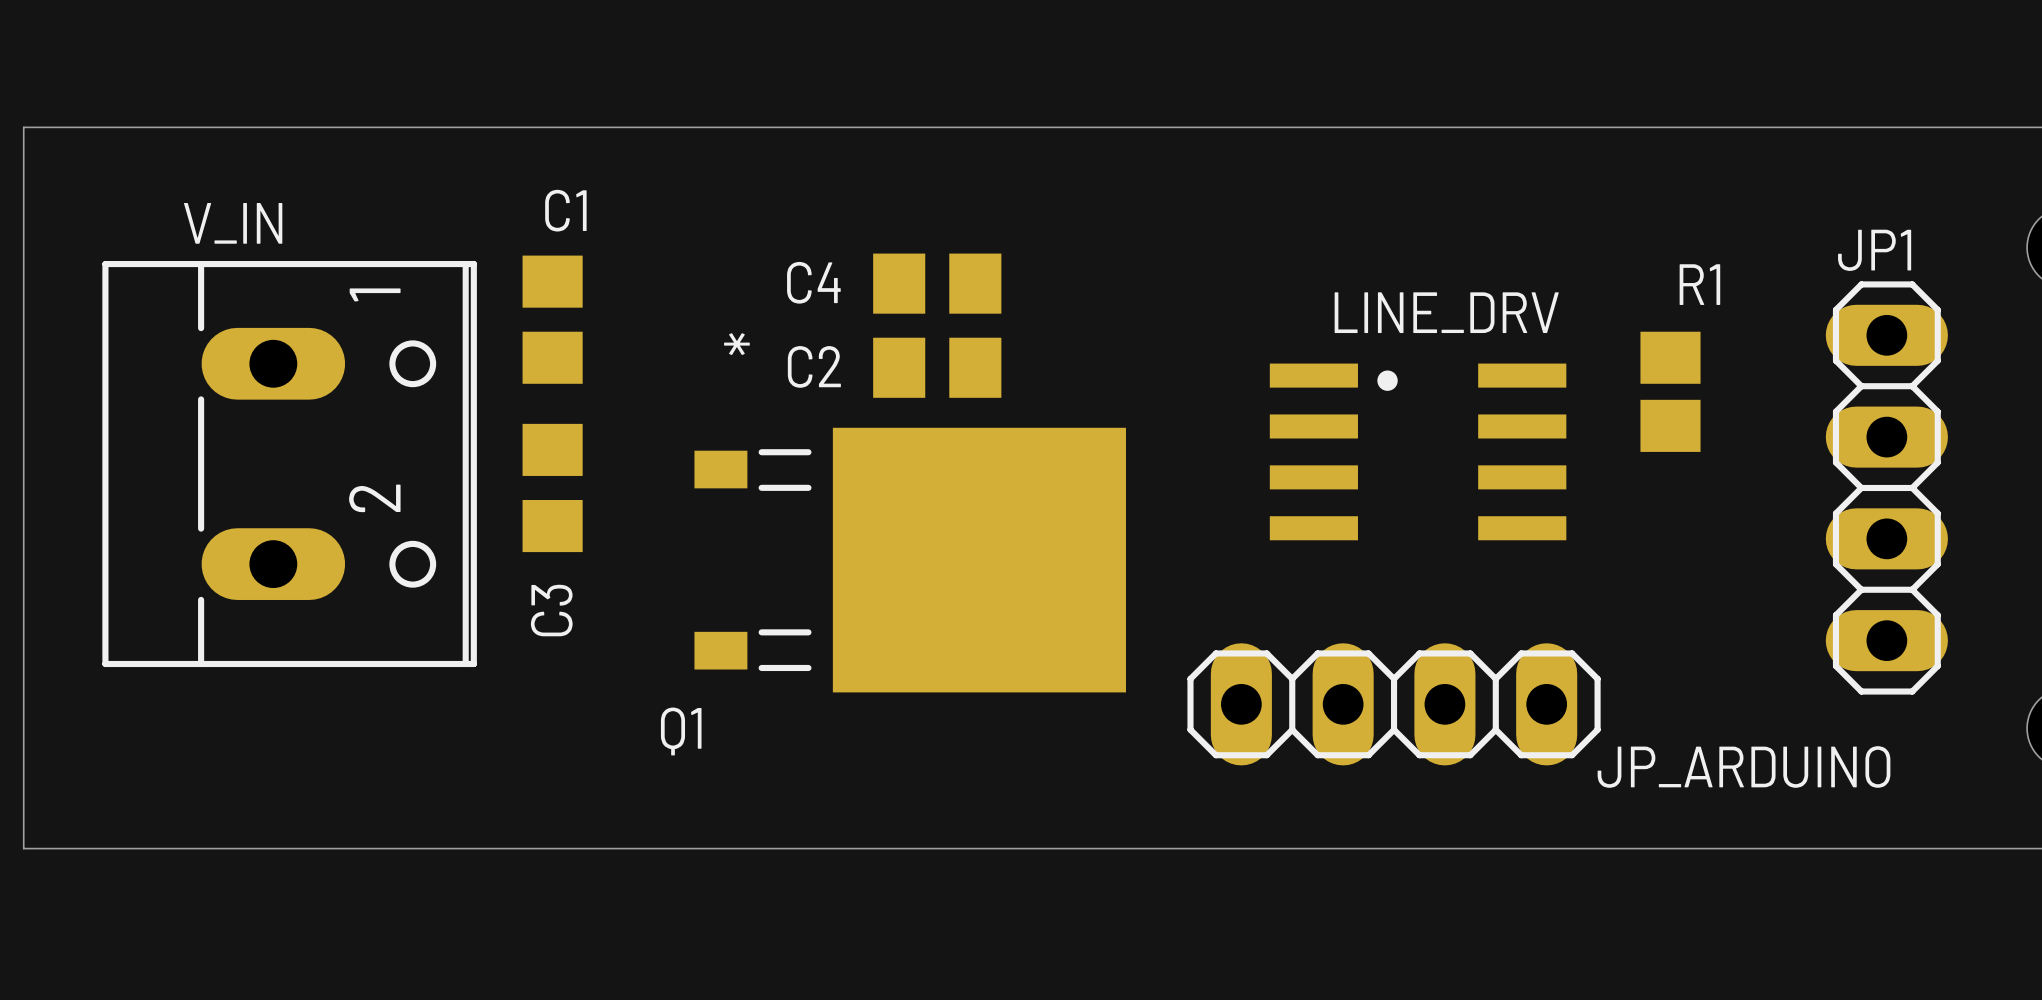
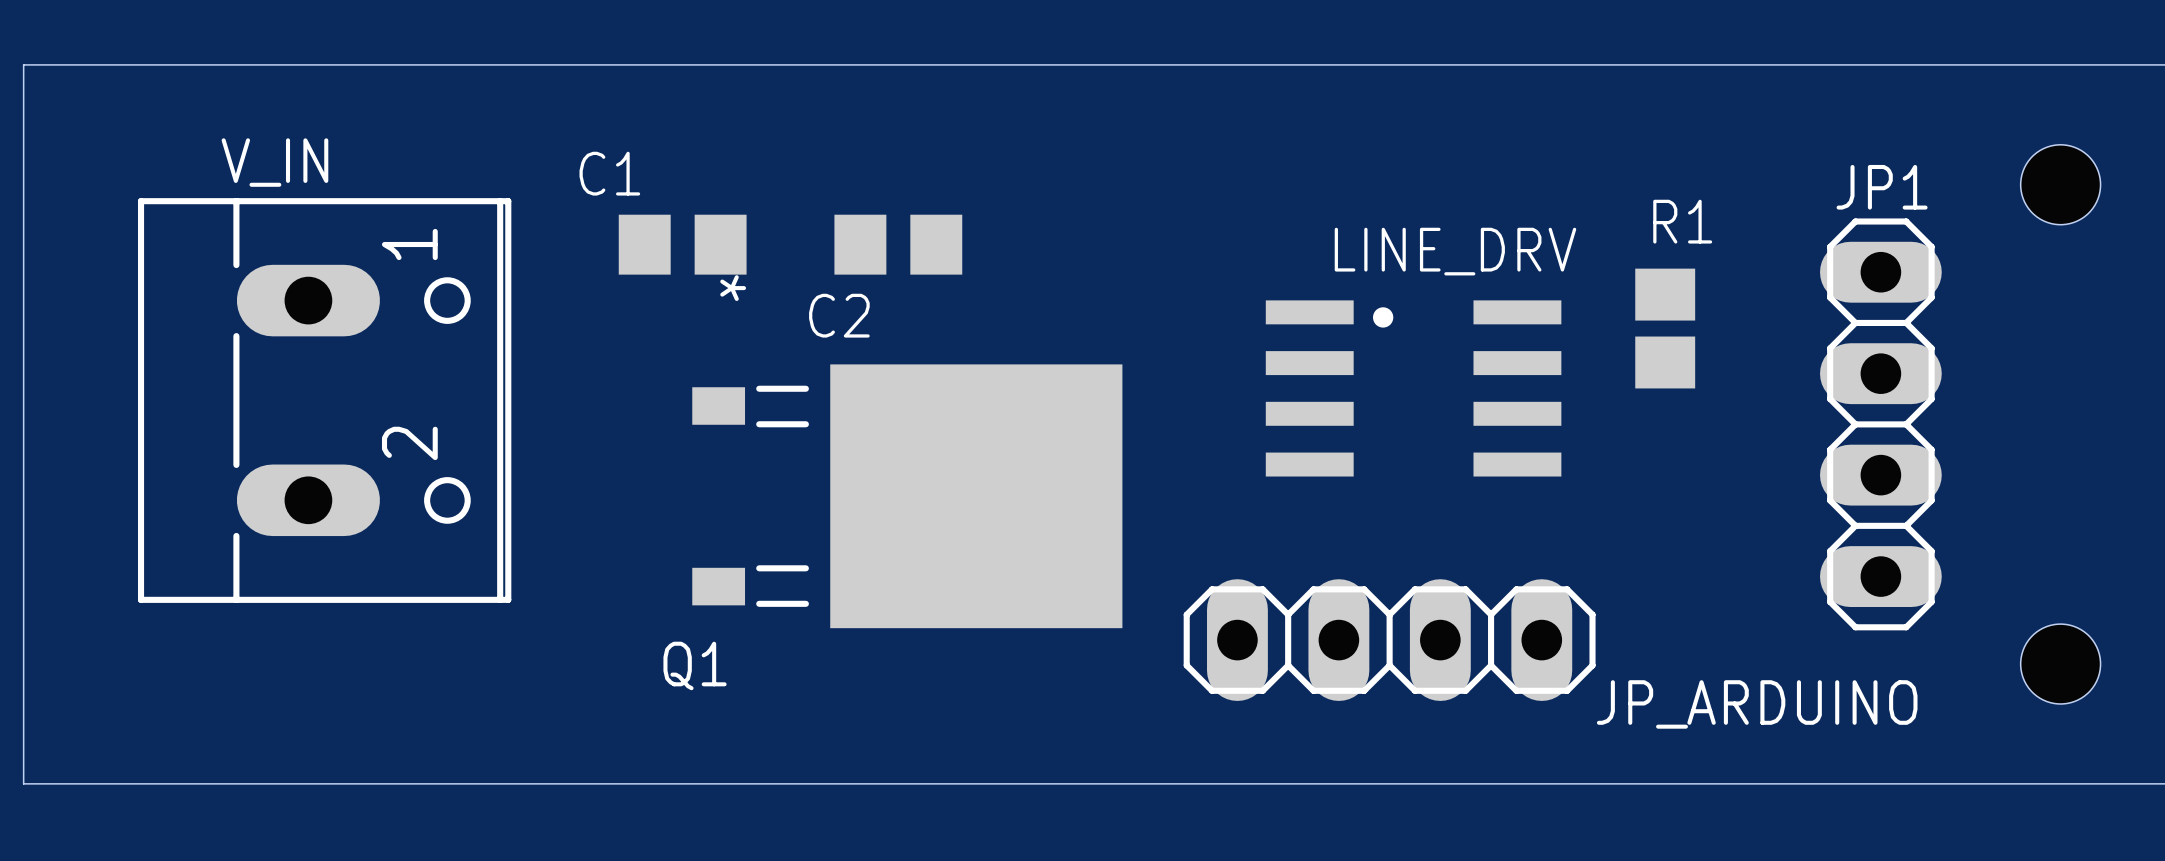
C4: (937, 283) -> none
C1 rotation: 0° (552, 319) -> 90° clockwise (682, 244)
C1 position: (552, 319) -> (682, 244)
C2 name position: C2 (814, 366) -> C2 (839, 315)
C2 position: (937, 367) -> (898, 244)
V_IN position: (289, 464) -> (324, 400)
C3: (552, 487) -> none

